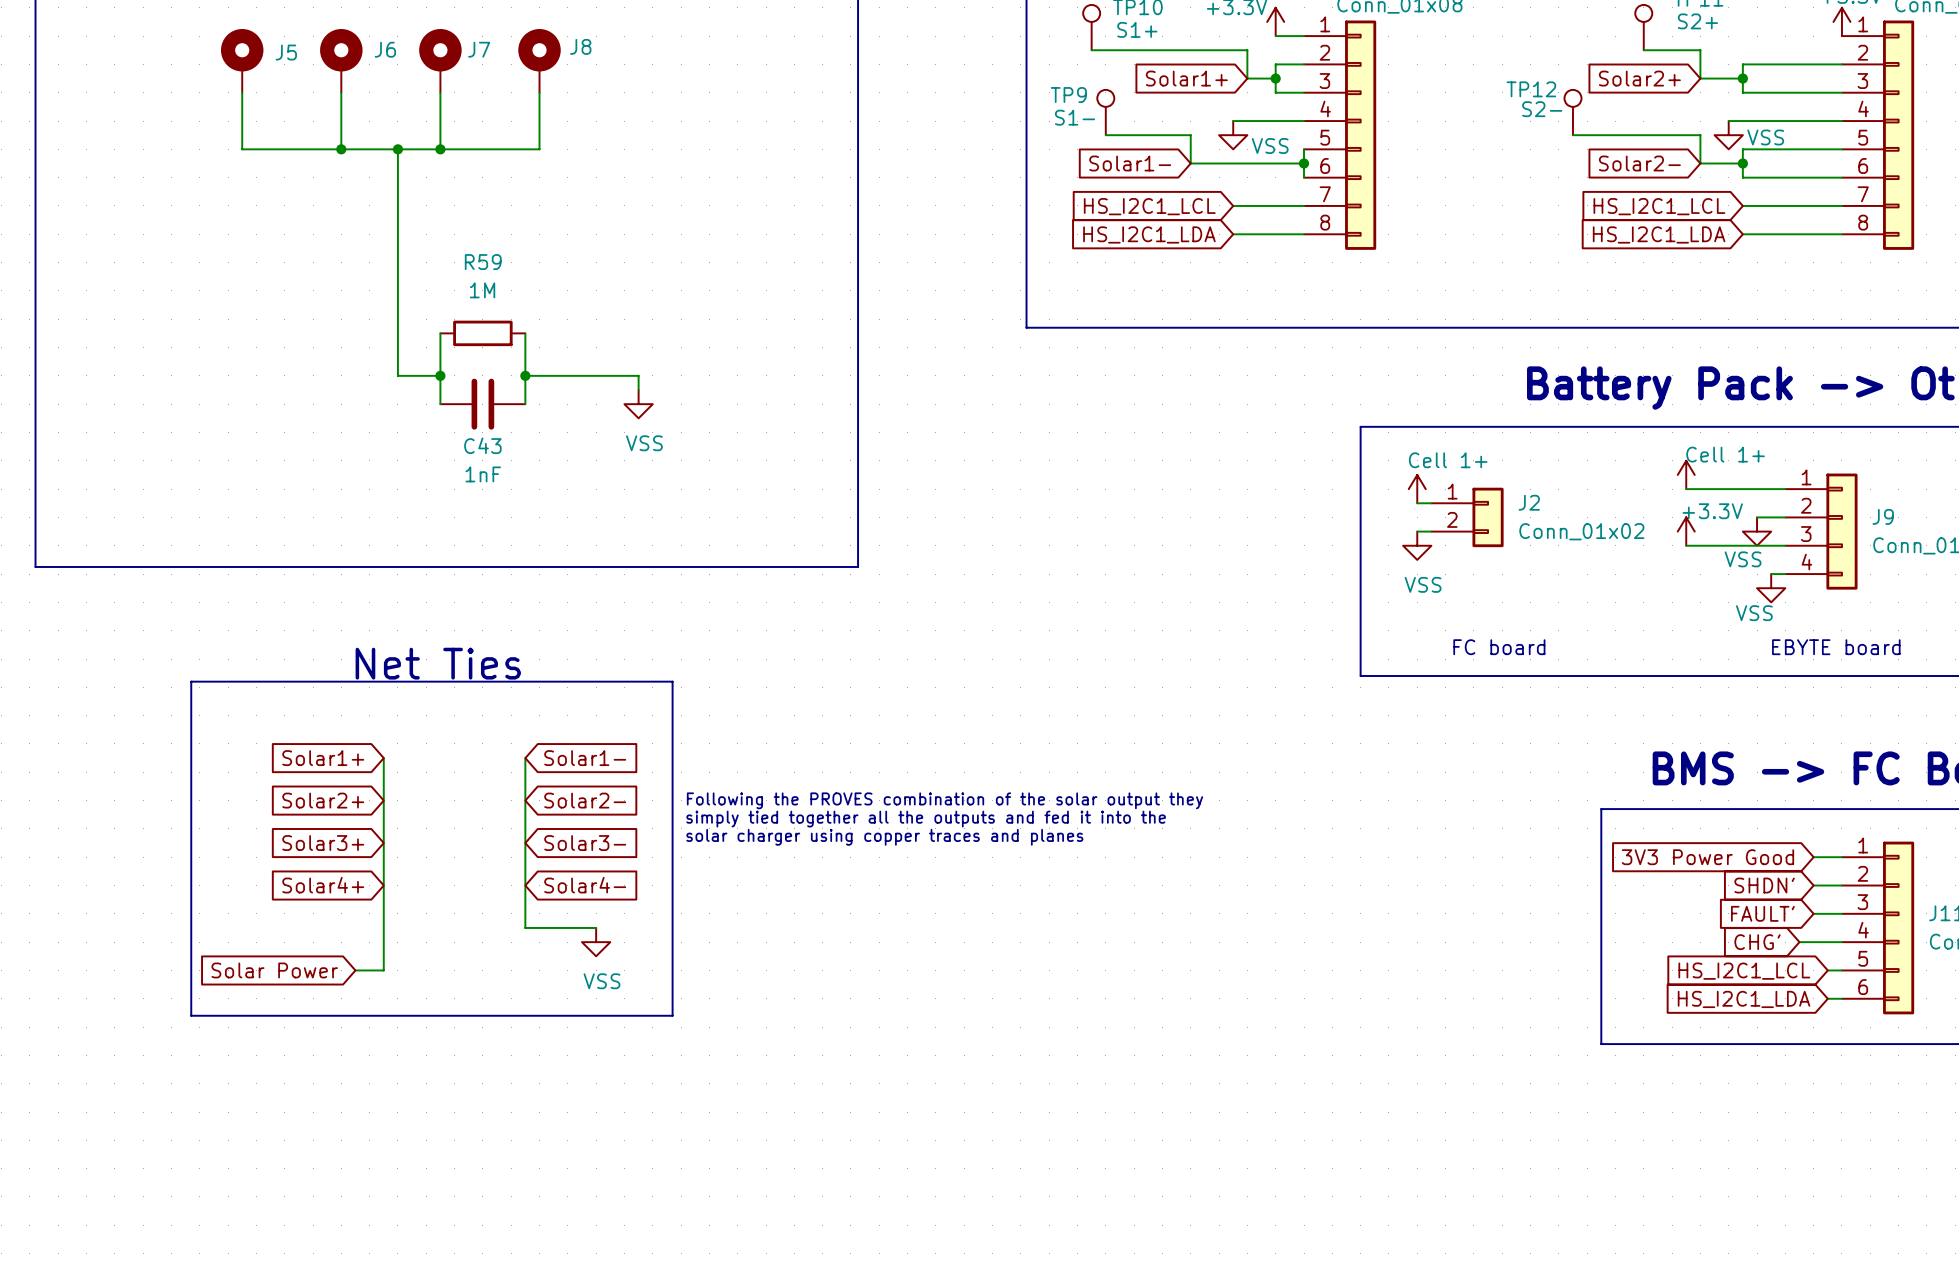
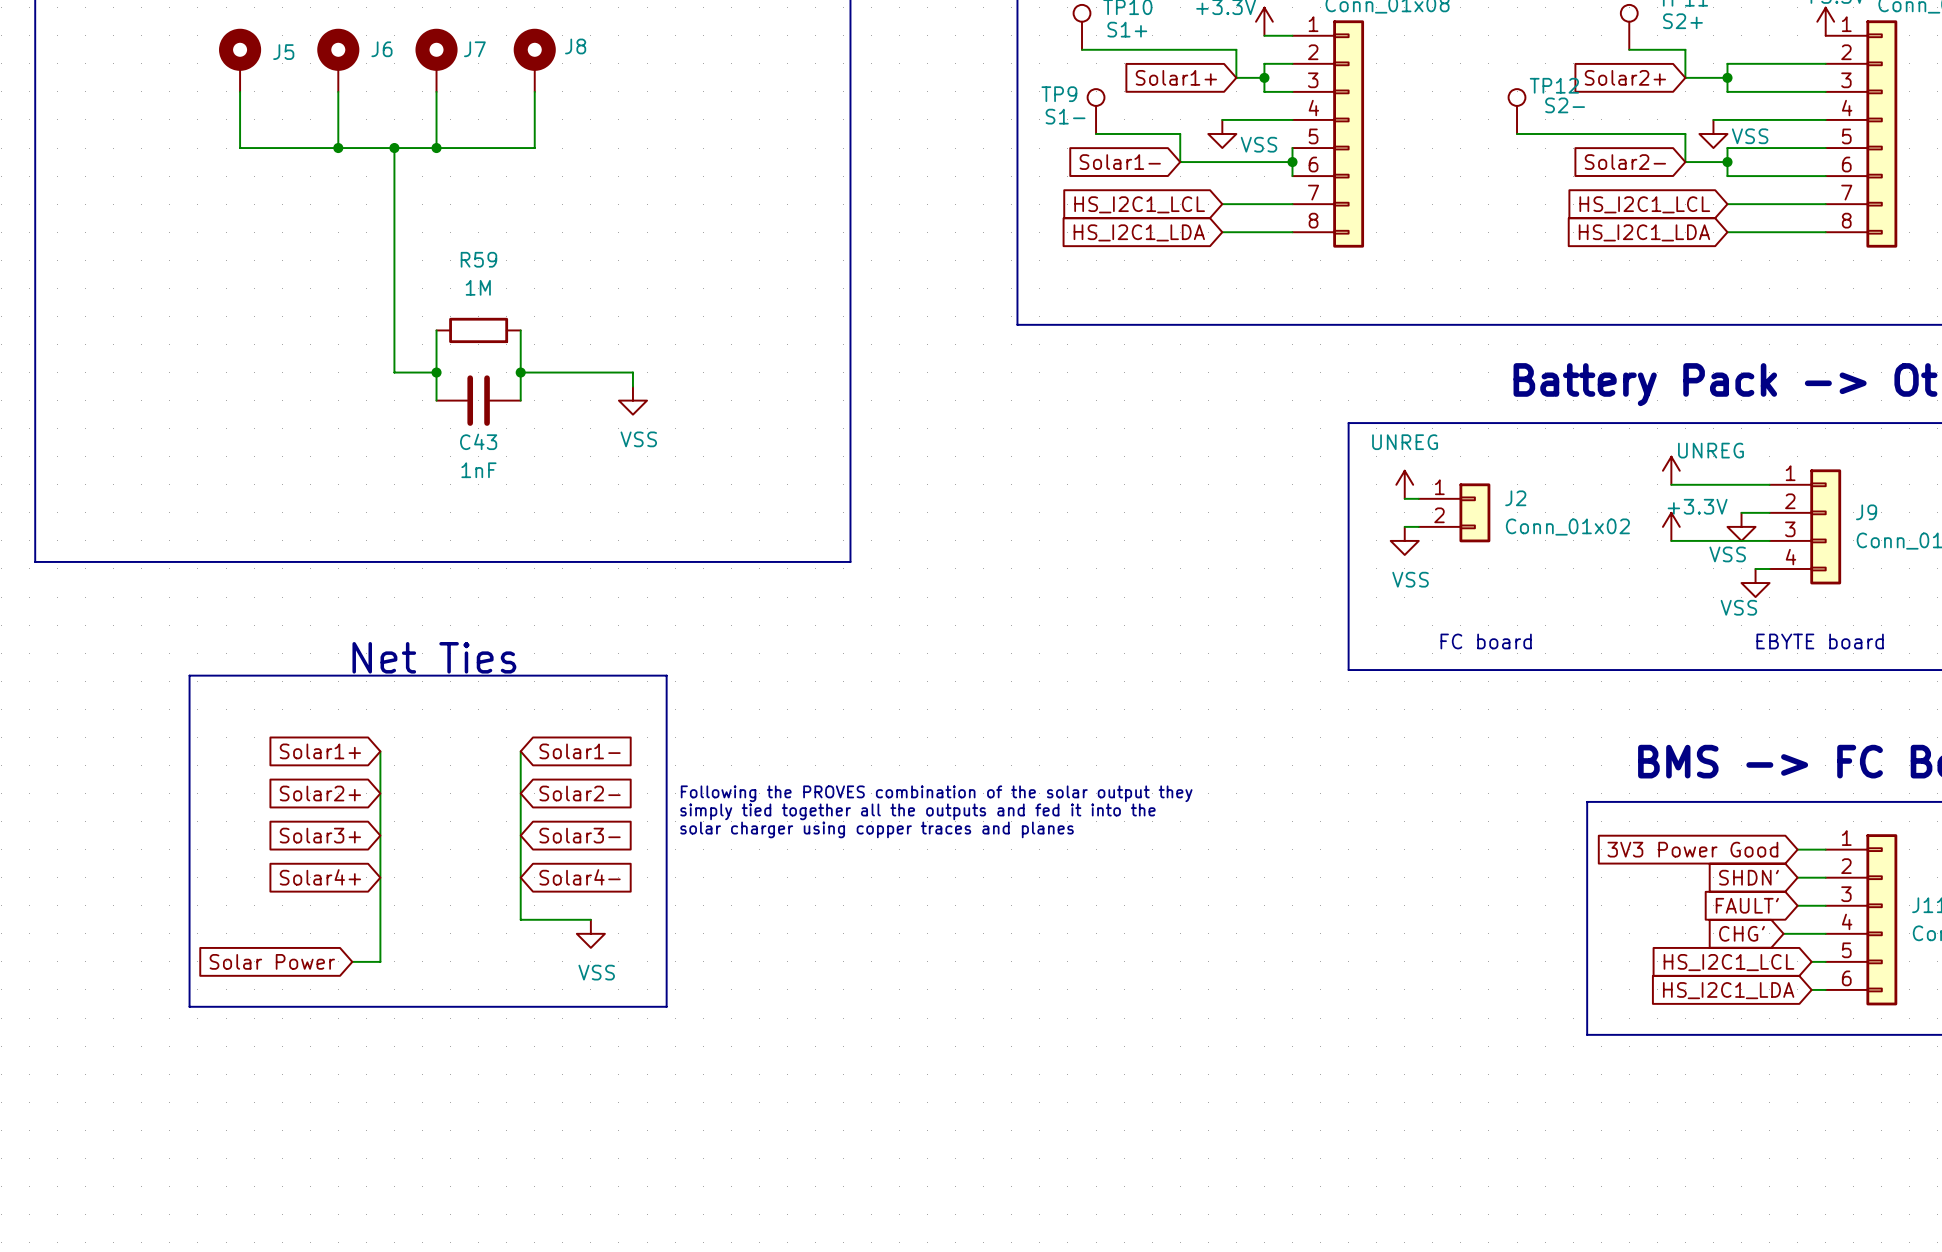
TP12 name position: TP12 (1531, 89) -> TP12 (1554, 85)
TP12 value position: S2- (1542, 109) -> S2- (1565, 105)
TP12 position: (1572, 112) -> (1517, 111)
wire: none -> (1517, 133) (1559, 133)
power symbol: Cell 1+ (1686, 474) -> UNREG (1671, 470)
power symbol: Cell 1+ (1417, 489) -> UNREG (1404, 484)

